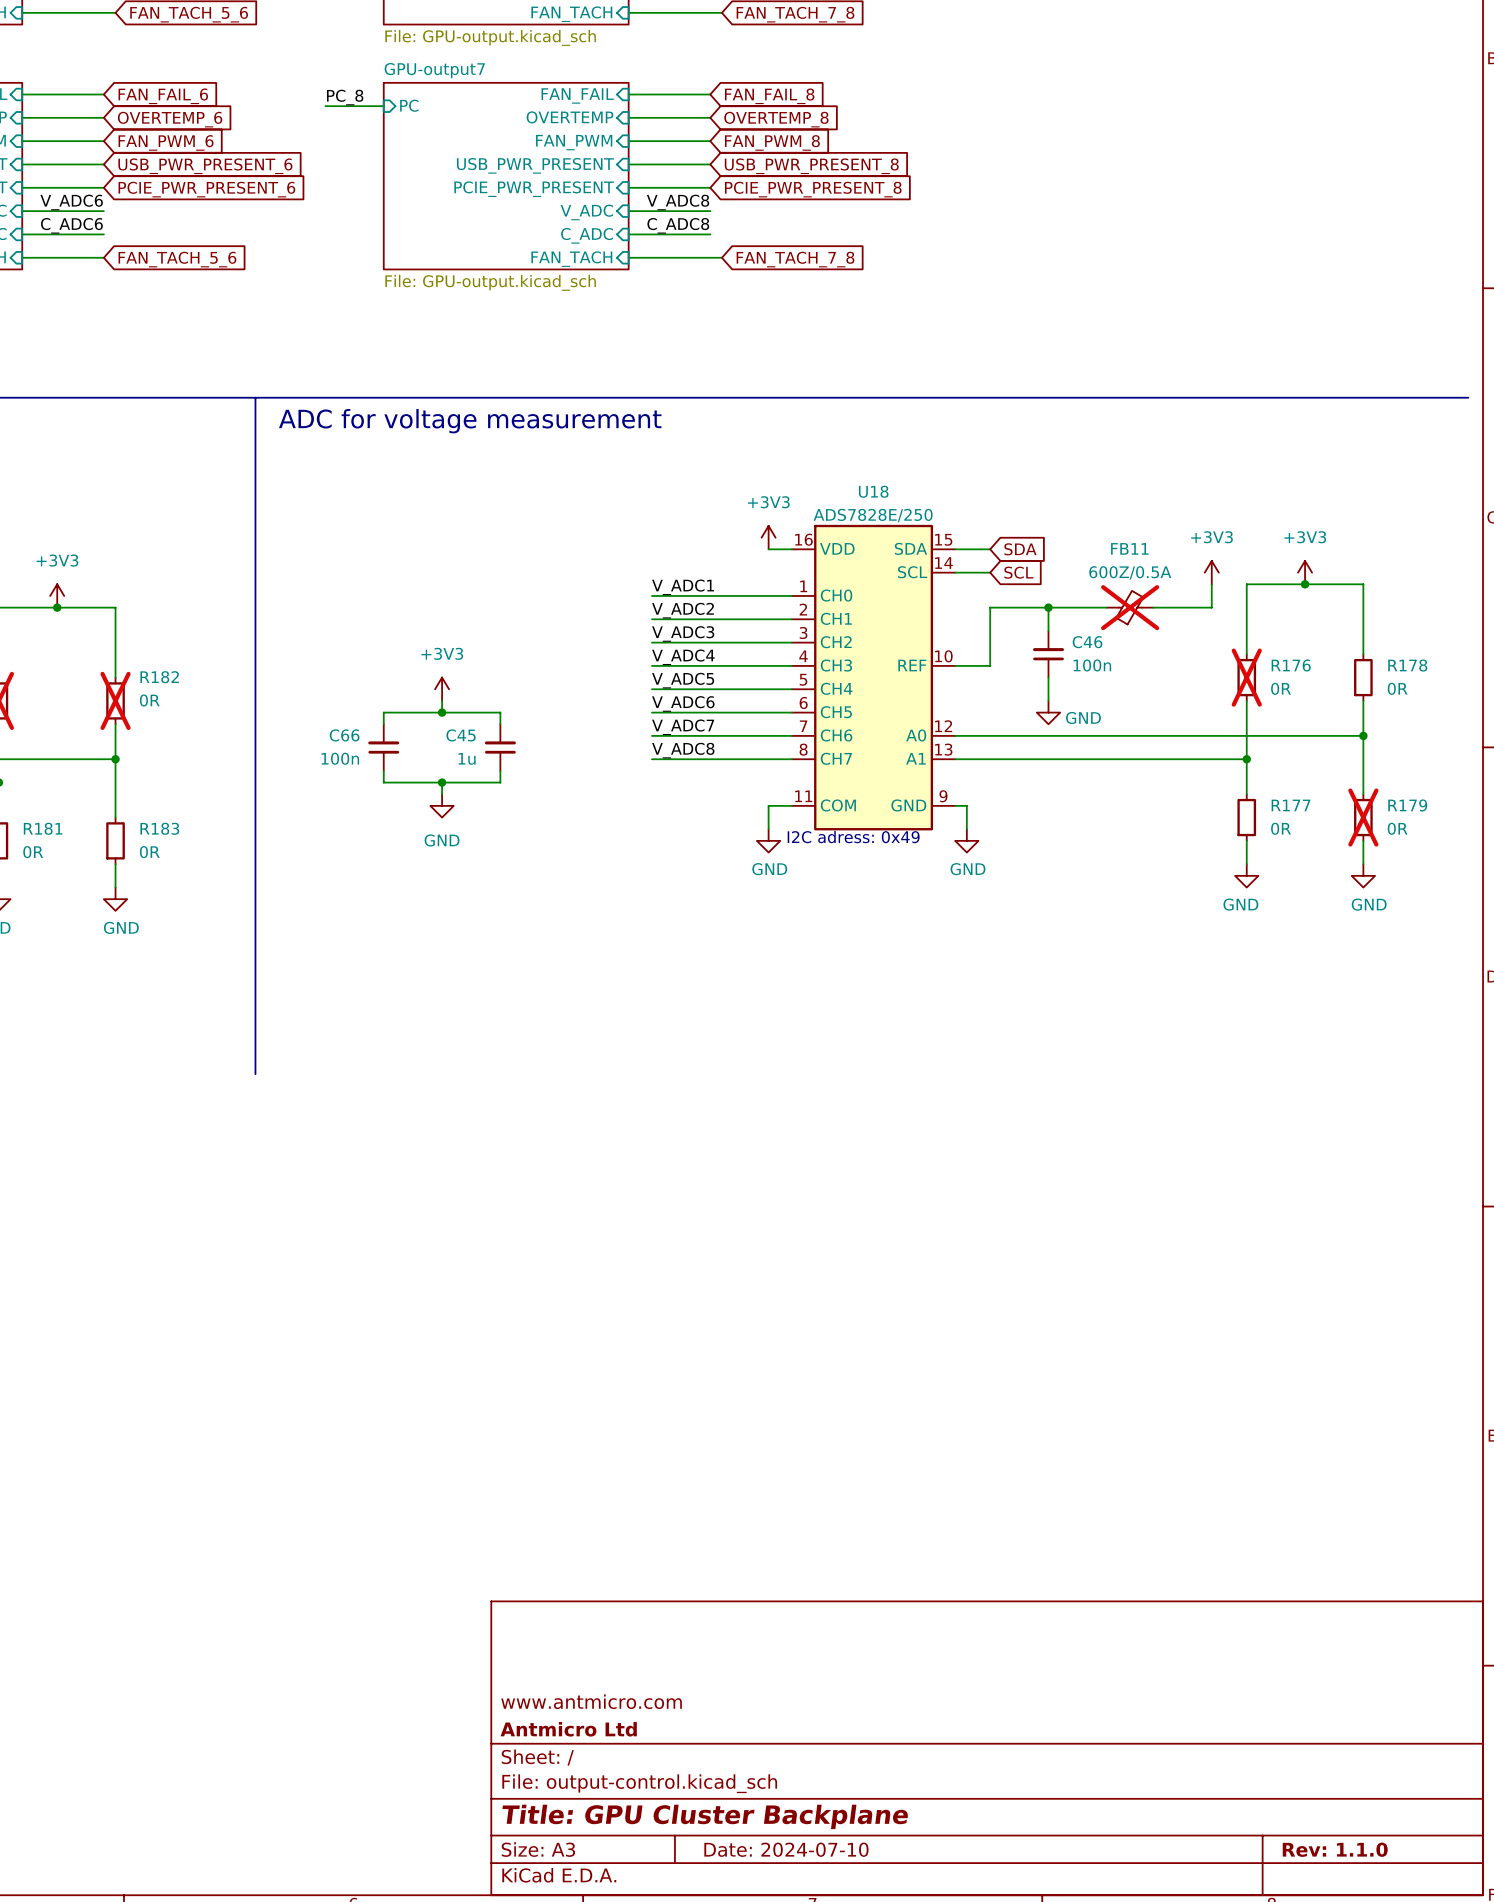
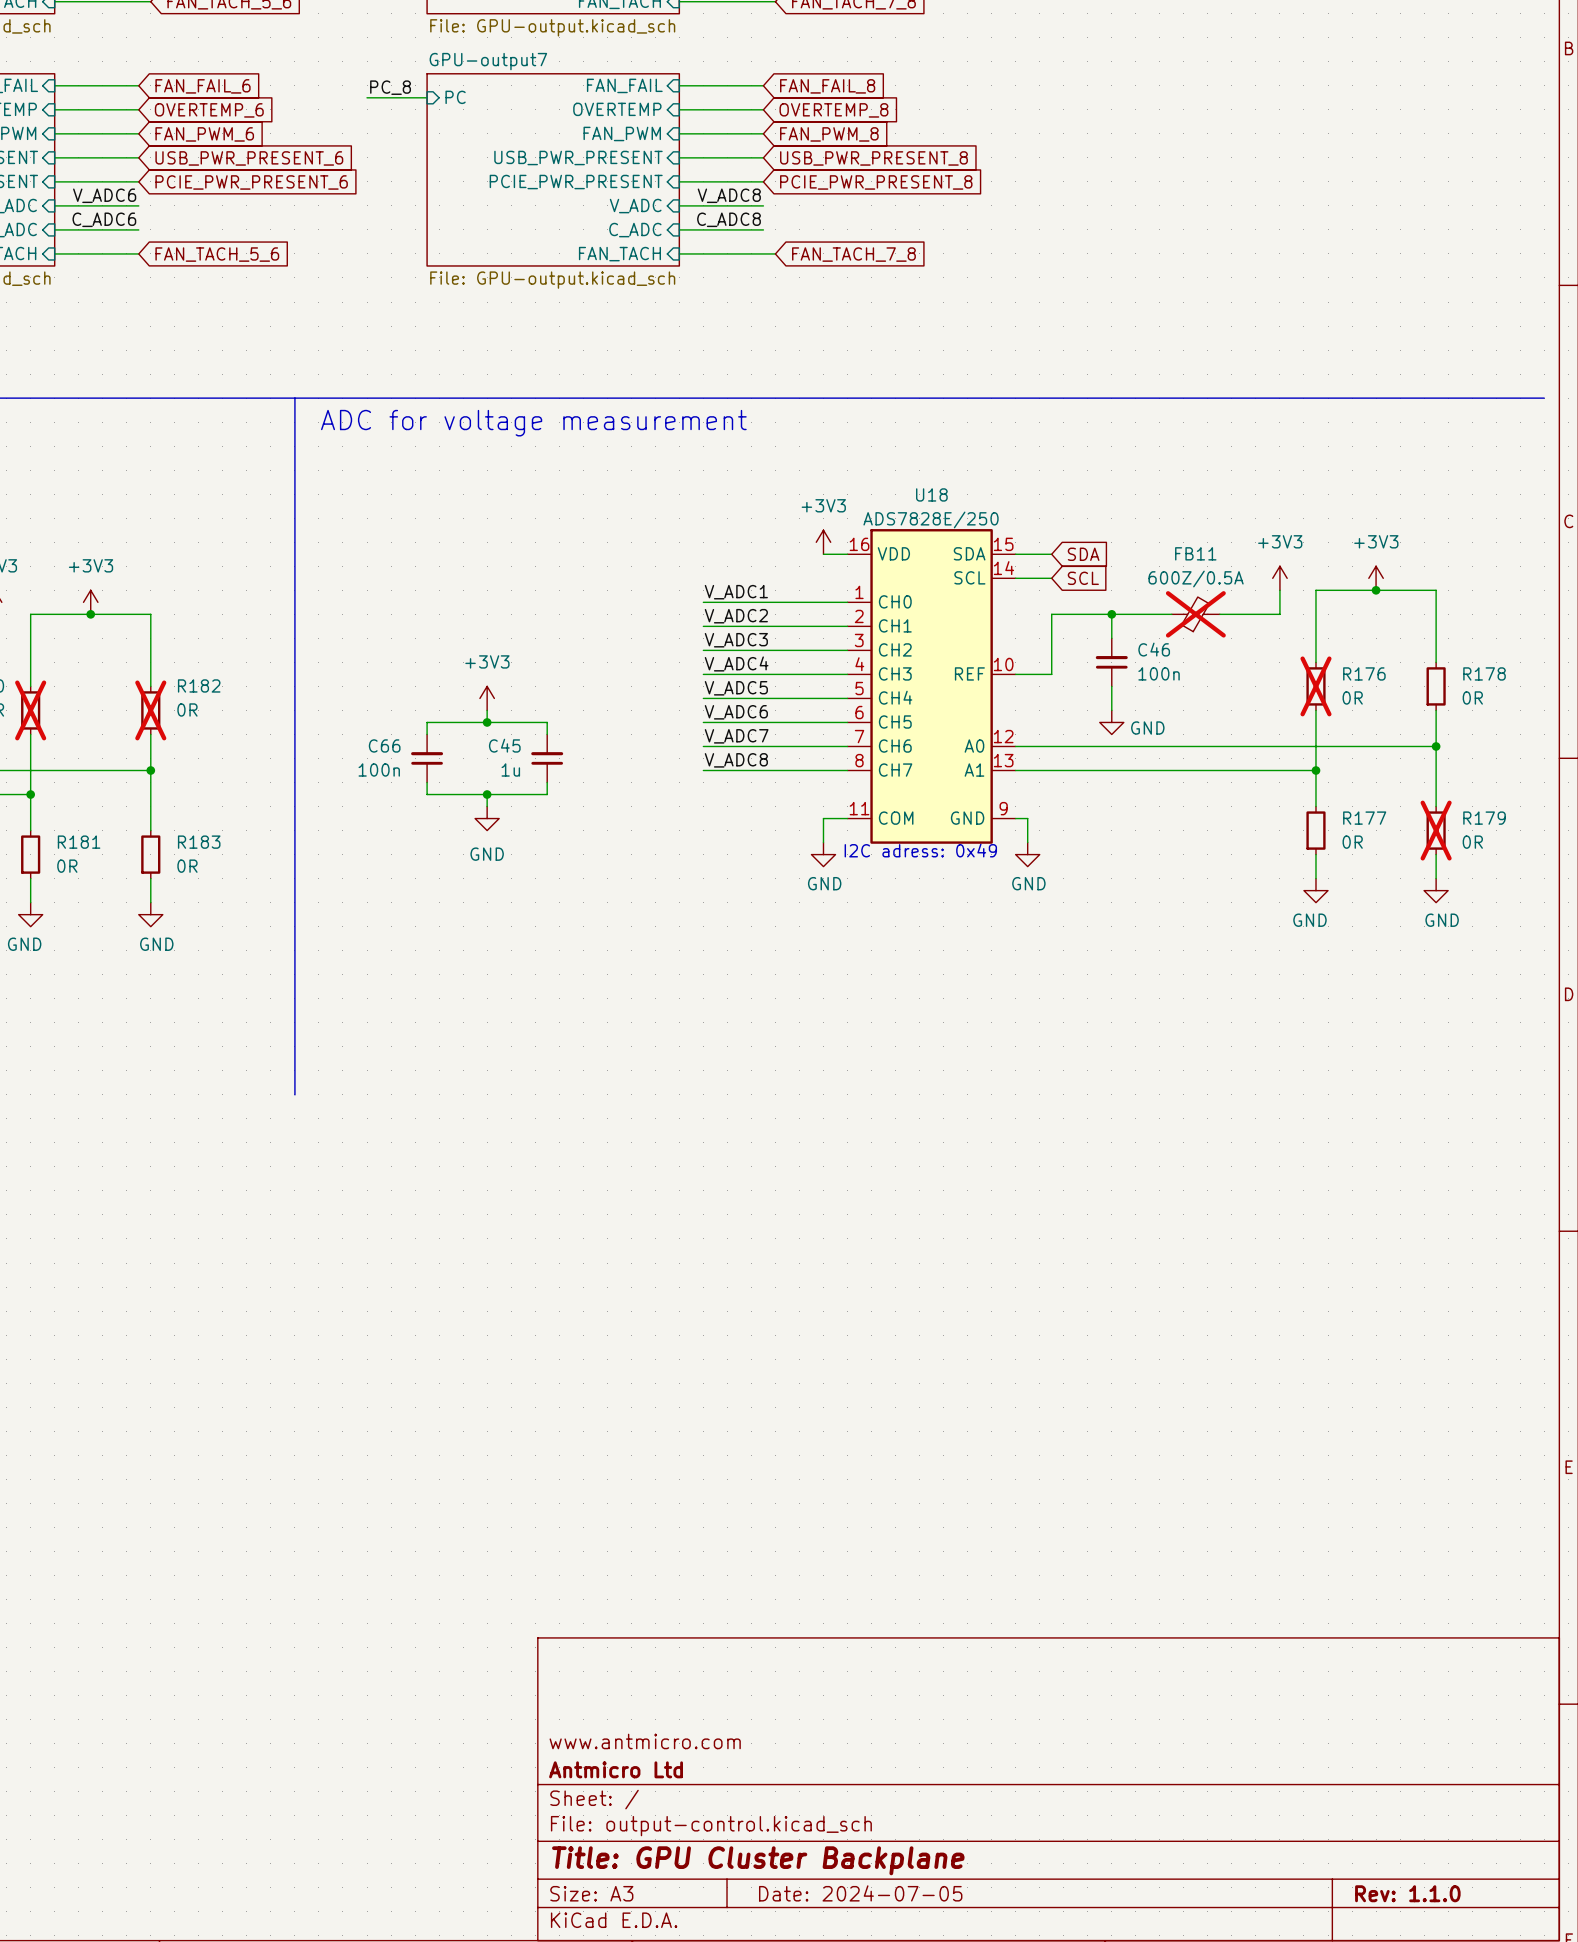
title block: Date: 2024-07-10 (786, 1849) -> Date: 2024-07-05 (860, 1893)

